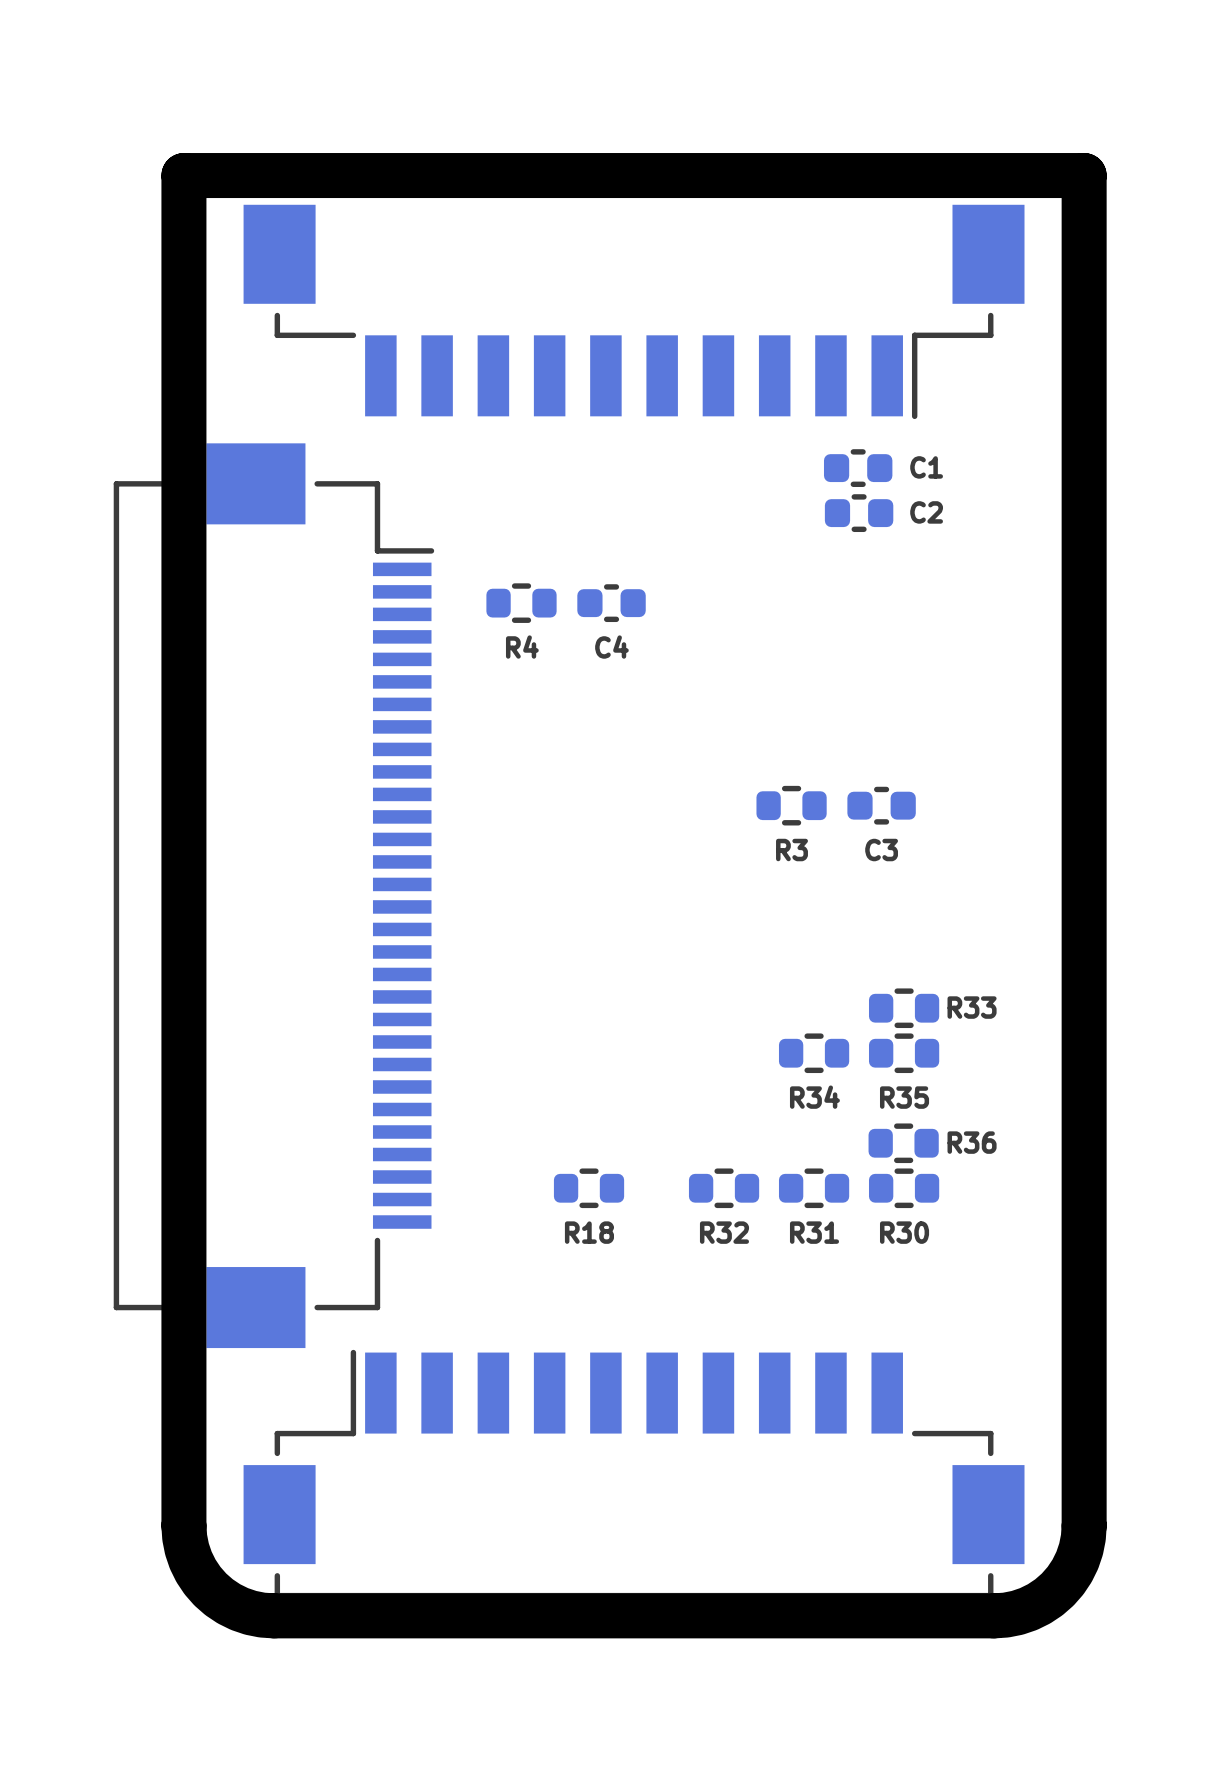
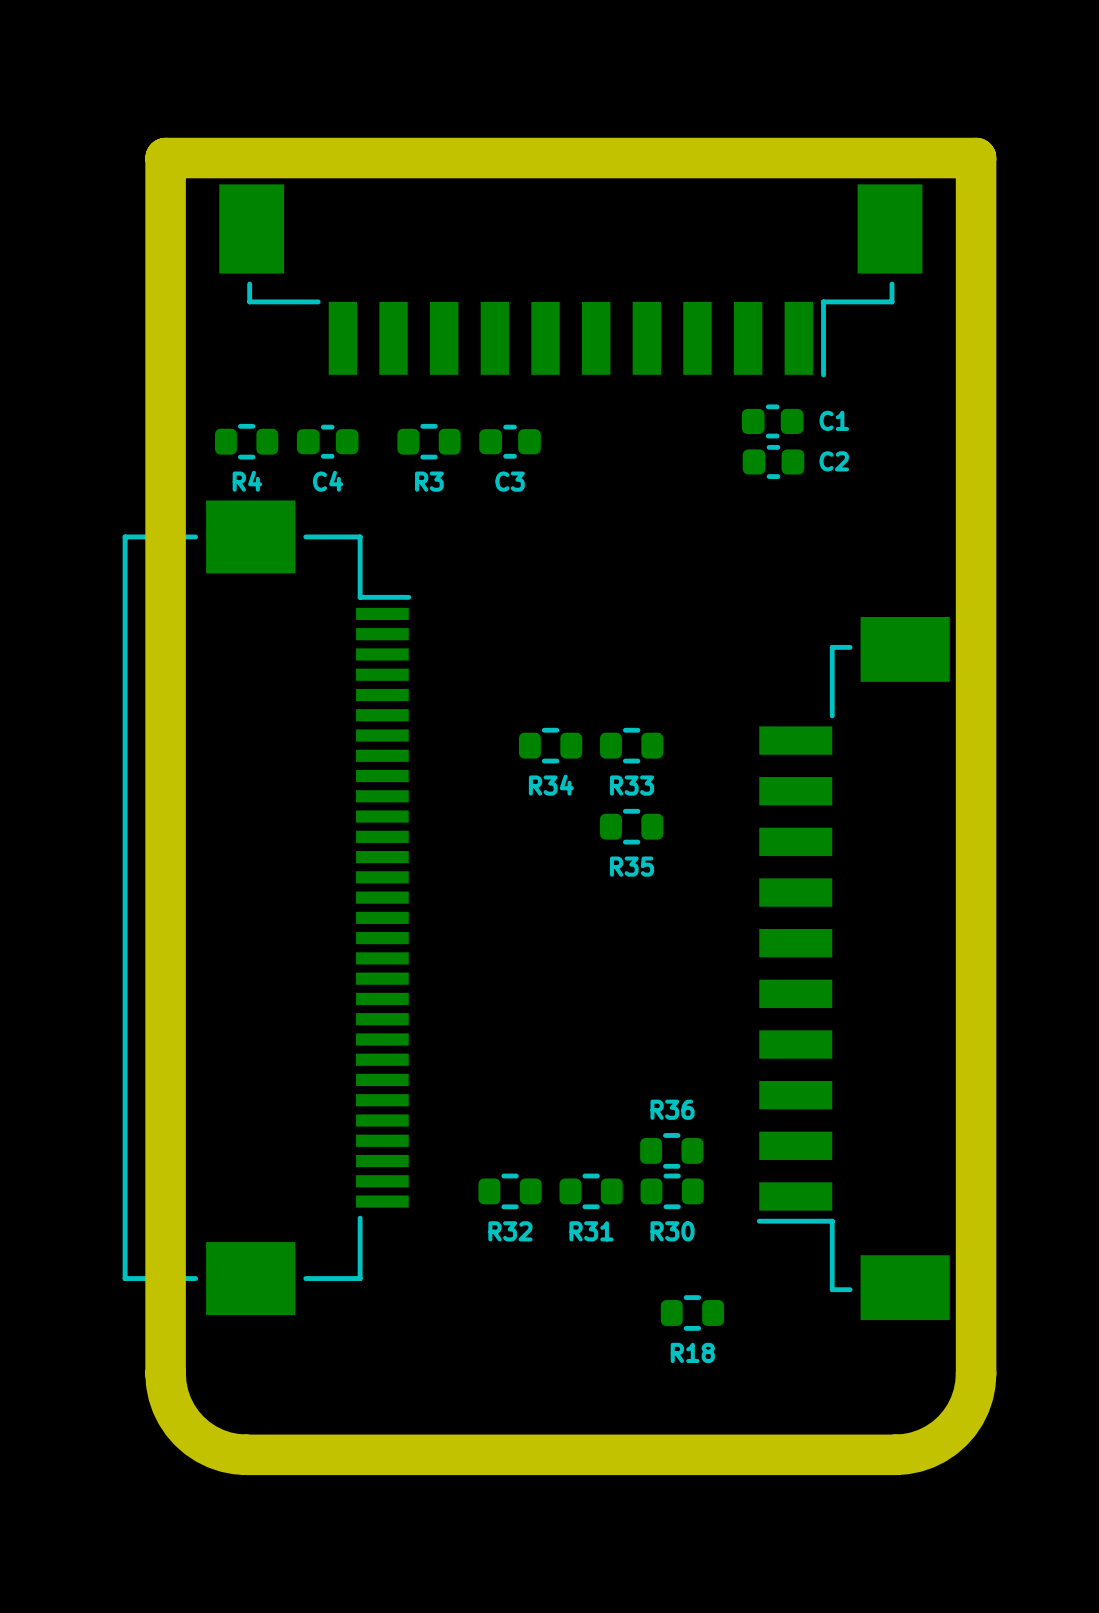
R4 position: (521, 603) -> (246, 441)
C4 position: (611, 603) -> (327, 441)
R3 position: (791, 805) -> (429, 441)
C3 position: (881, 805) -> (510, 441)
part position: (273, 895) -> (266, 907)
R33 name position: R33 (972, 1007) -> R33 (632, 785)
R35 position: (904, 1008) -> (631, 826)
R34 position: (814, 1053) -> (550, 745)
R33 position: (904, 1053) -> (631, 745)
R35 name position: R35 (904, 1097) -> R35 (632, 866)
R36 name position: R36 (972, 1142) -> R36 (672, 1109)
R36 position: (903, 1143) -> (671, 1150)
R18 position: (589, 1188) -> (692, 1312)
R32 position: (724, 1188) -> (510, 1191)
R31 position: (814, 1188) -> (591, 1191)
R30 position: (904, 1188) -> (672, 1191)
part rotation: 0° (634, 1474) -> 90° counterclockwise (868, 968)
part position: (634, 1474) -> (868, 968)

